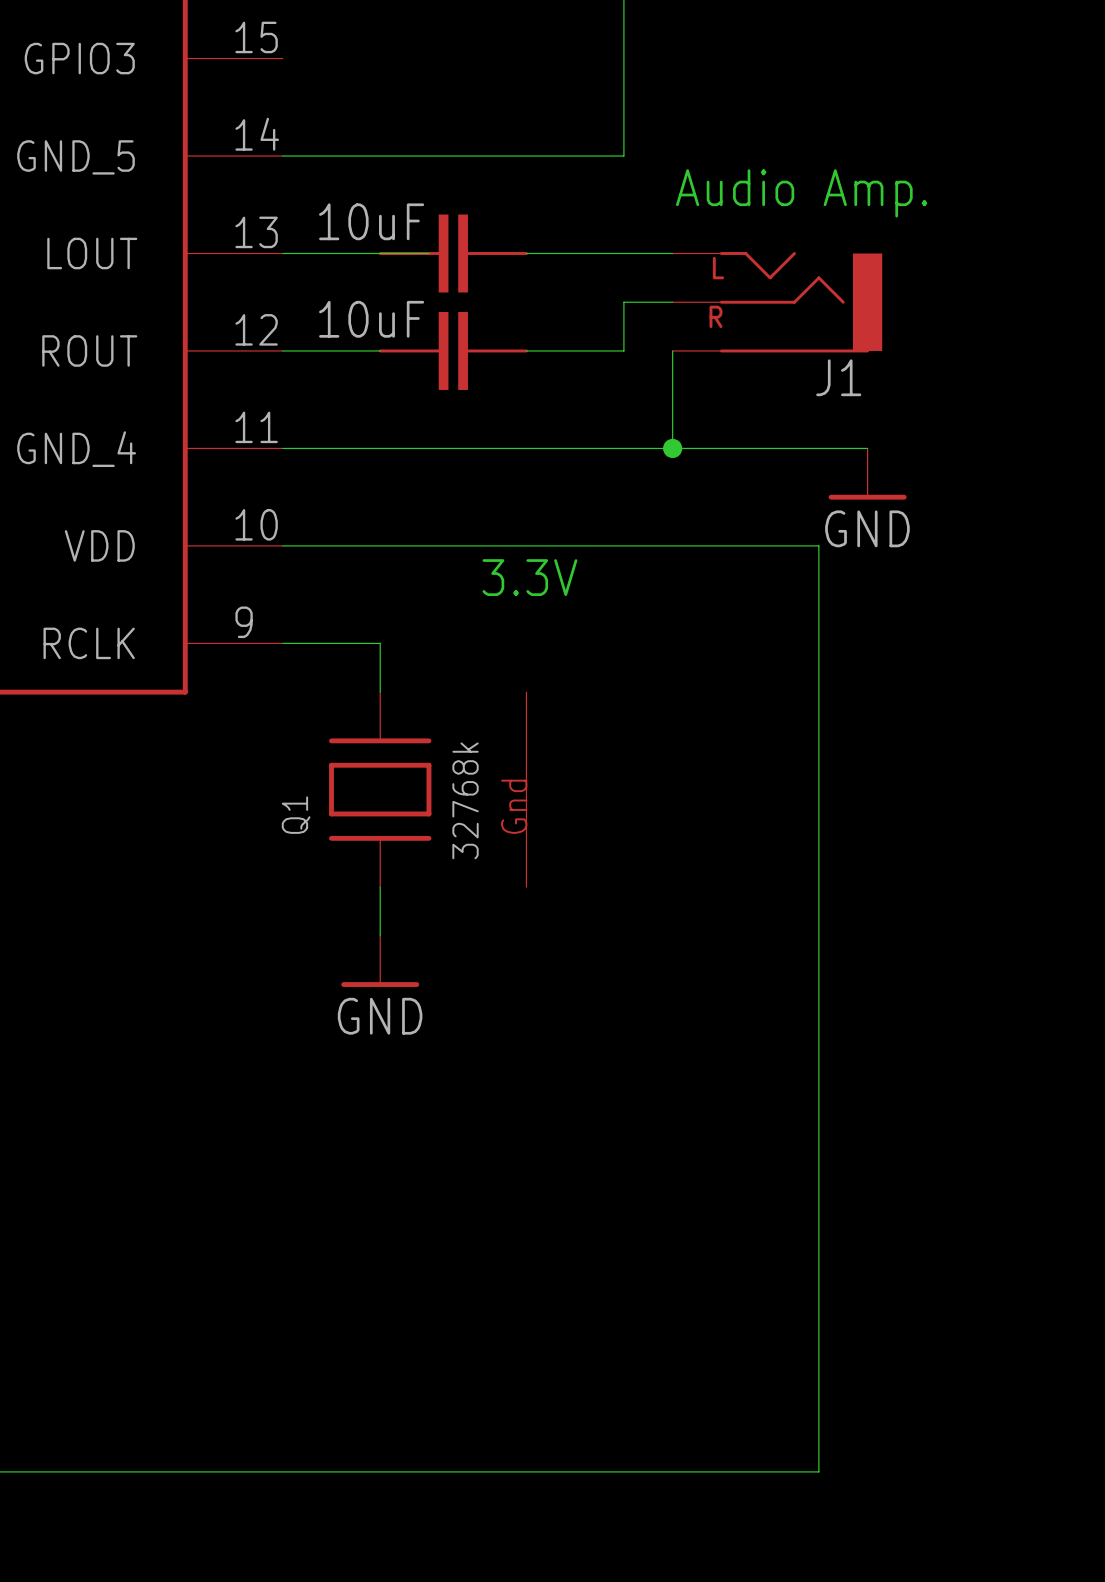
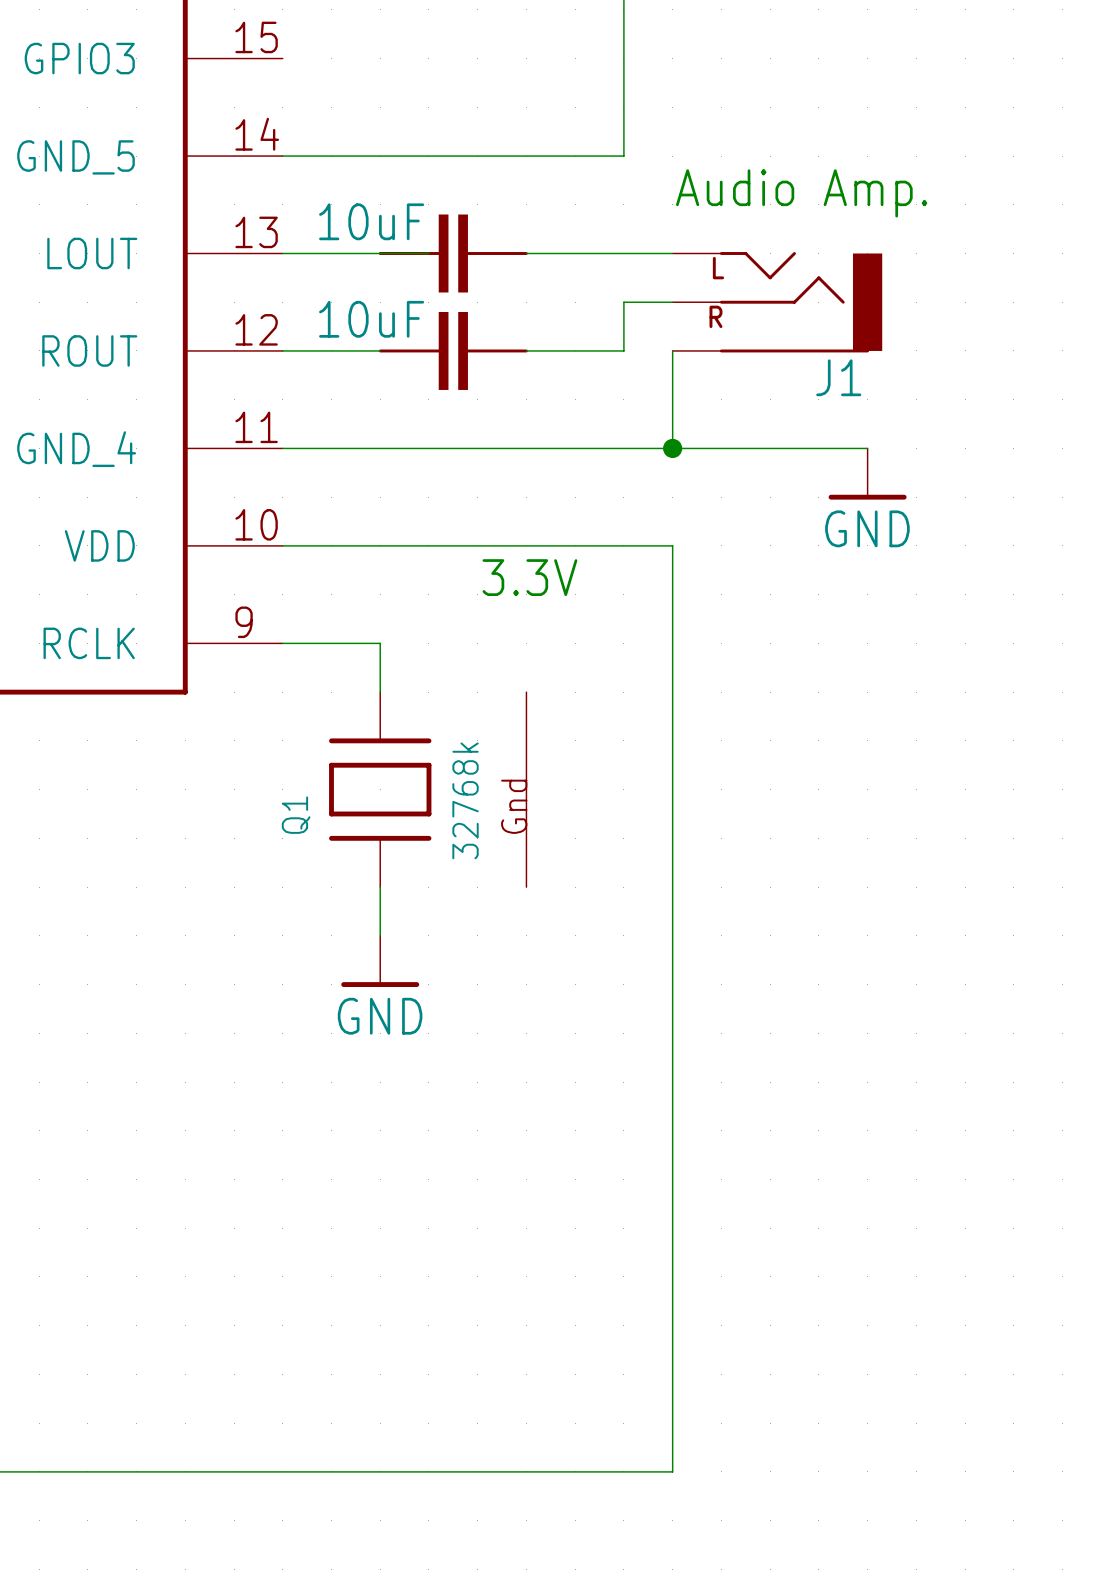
wire: (672, 545) (818, 545) (818, 1471) (672, 1471) -> (672, 545) (672, 1471)

